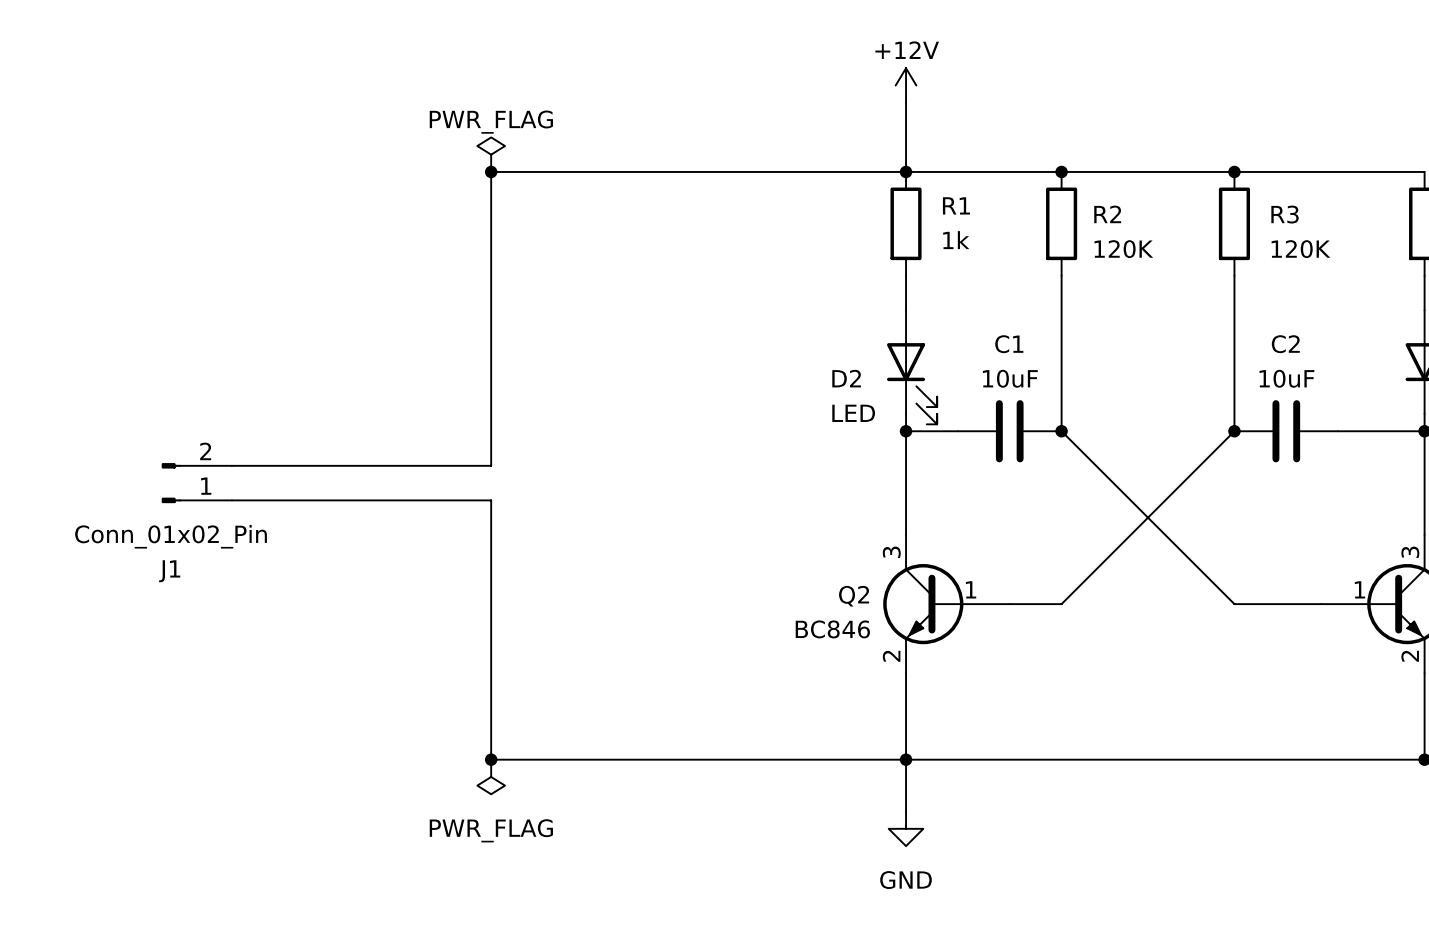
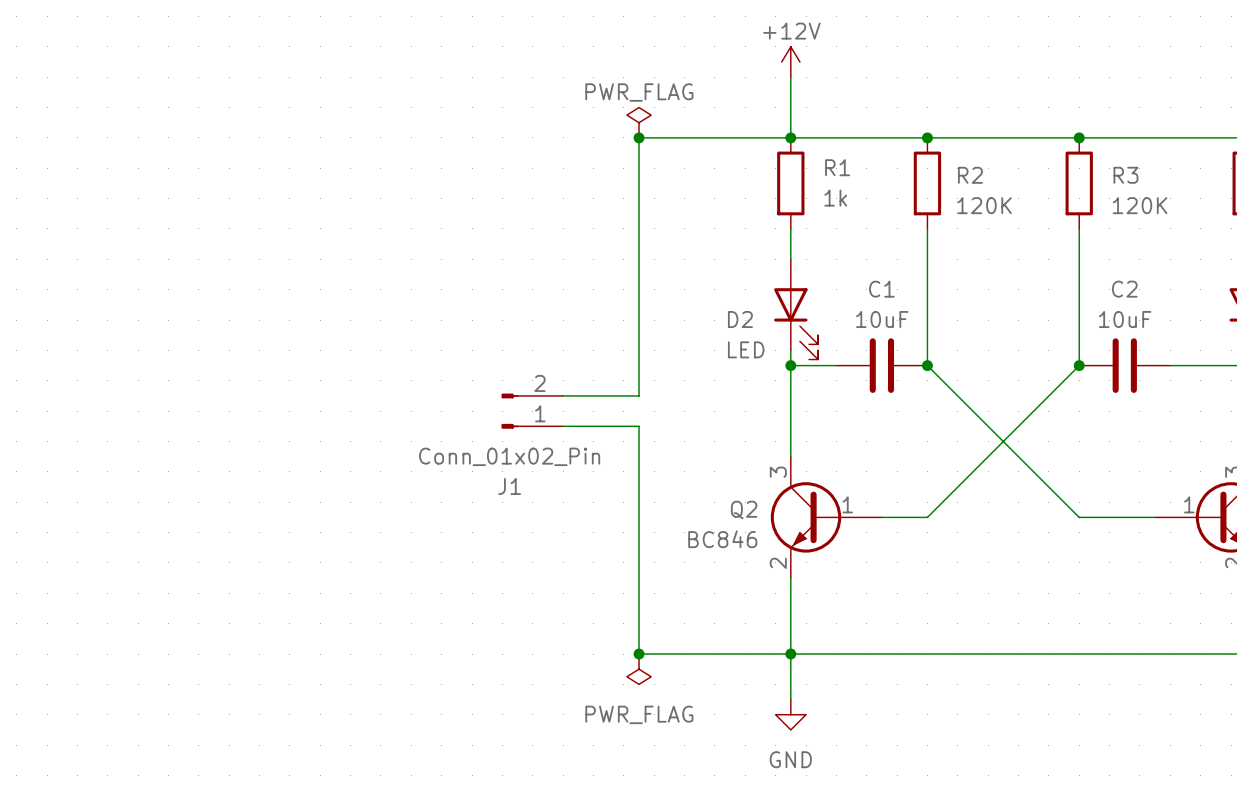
power symbol position: PWR_FLAG (491, 154) -> PWR_FLAG (639, 122)
junction: (491, 171) -> none
wire: (733, 171) (491, 171) (491, 465) (231, 465) -> (639, 137) (639, 395) (563, 395)
junction: none -> (639, 137)
J1 position: (196, 483) -> (532, 411)
wire: (231, 500) (491, 500) (491, 759) (733, 759) -> (563, 426) (639, 426) (639, 654)
junction: (491, 759) -> none
junction: none -> (639, 654)
power symbol position: PWR_FLAG (491, 776) -> PWR_FLAG (639, 669)

